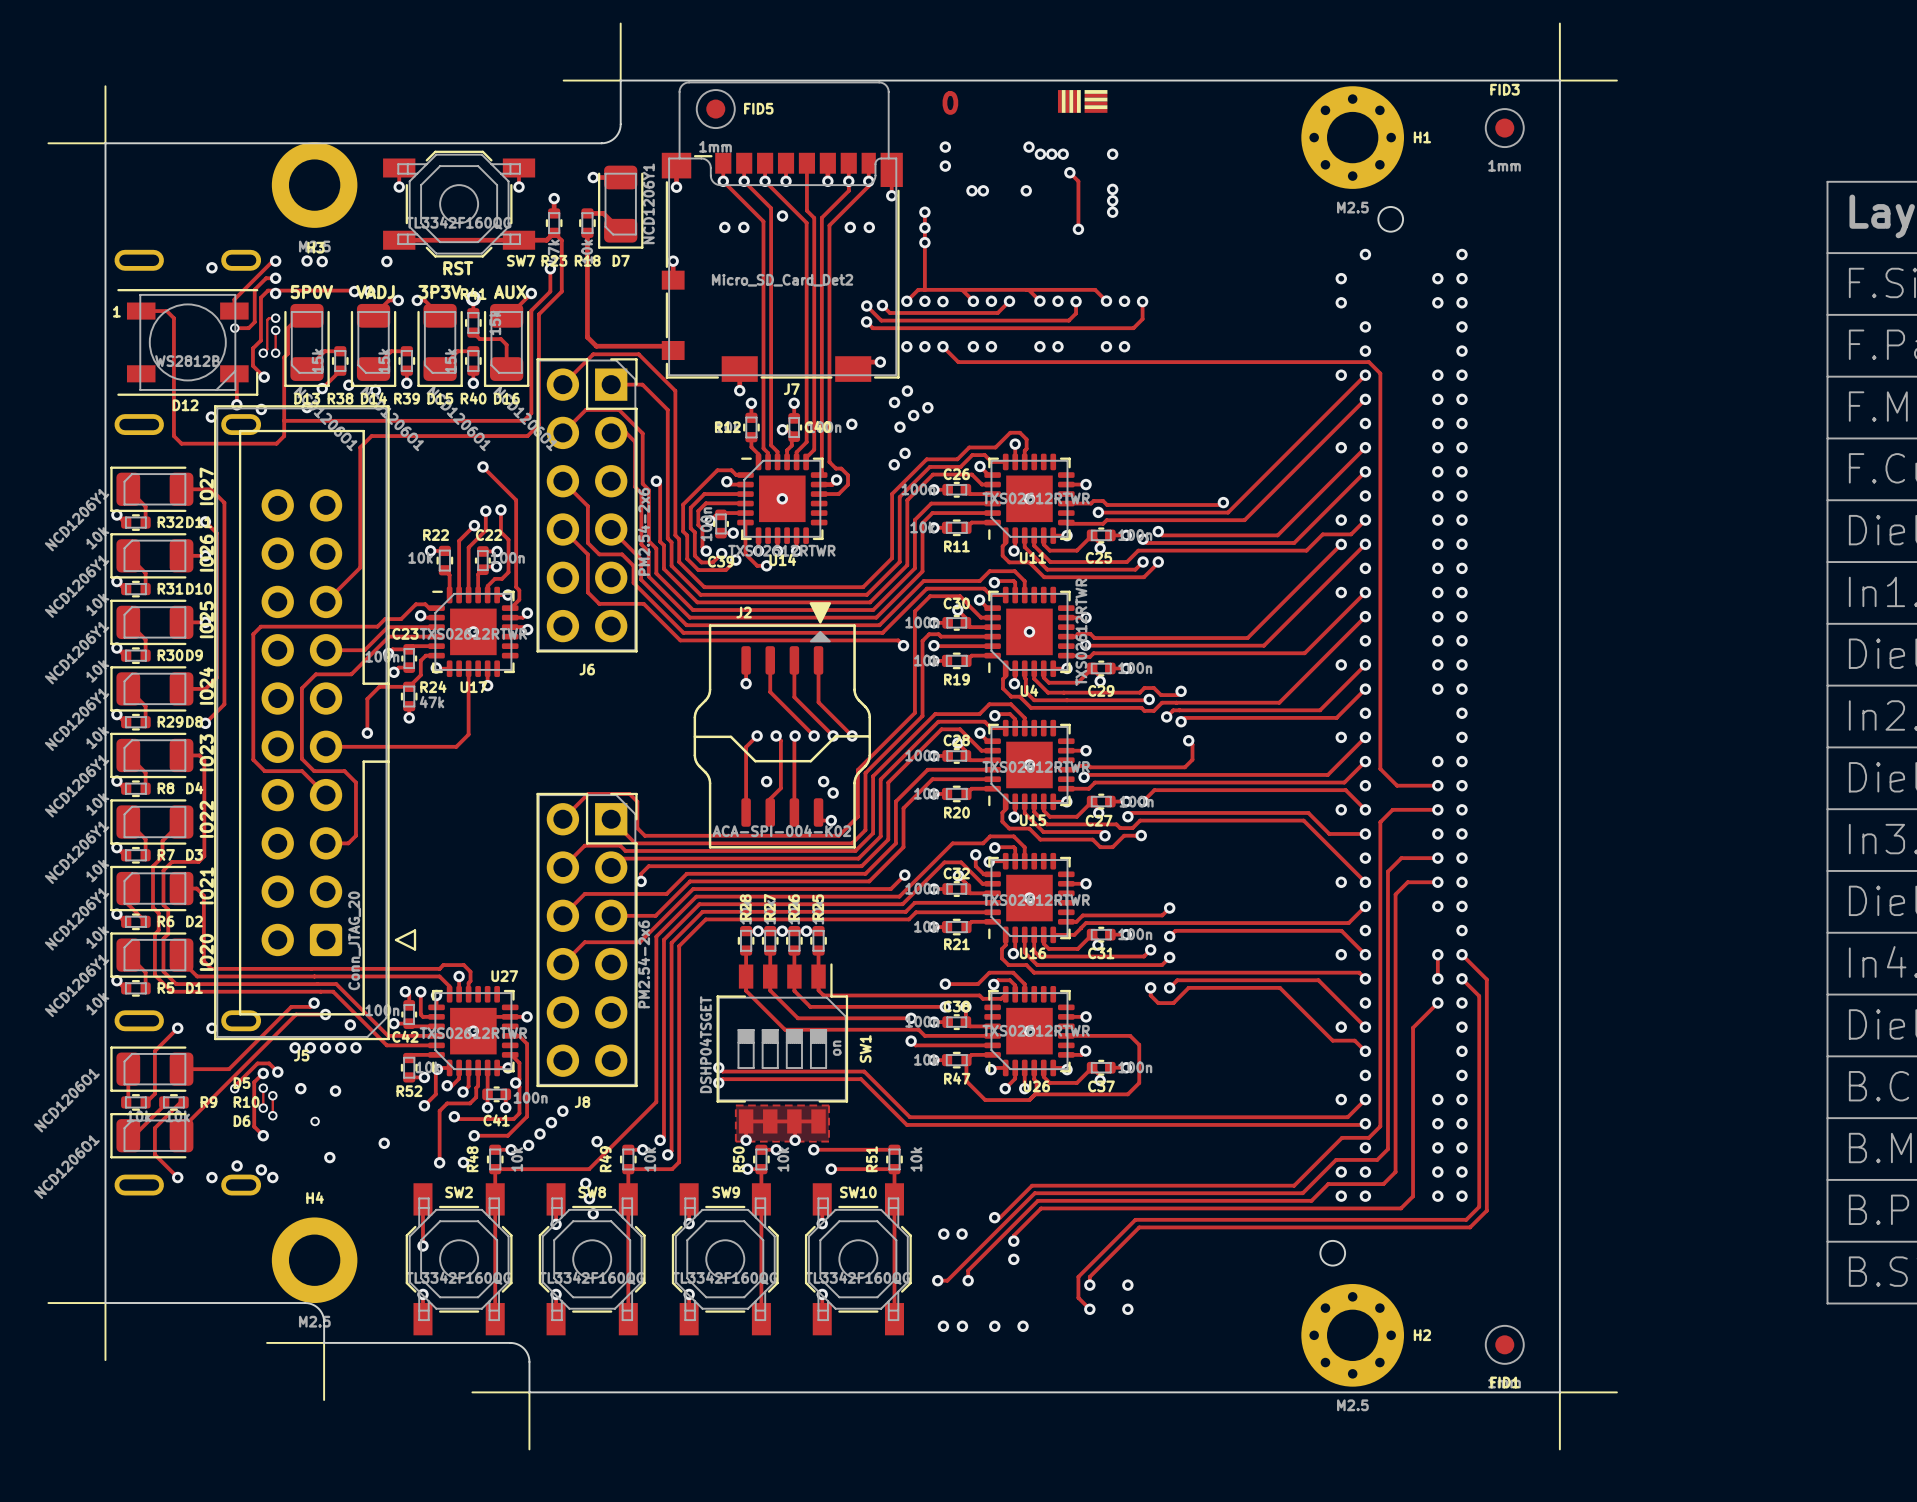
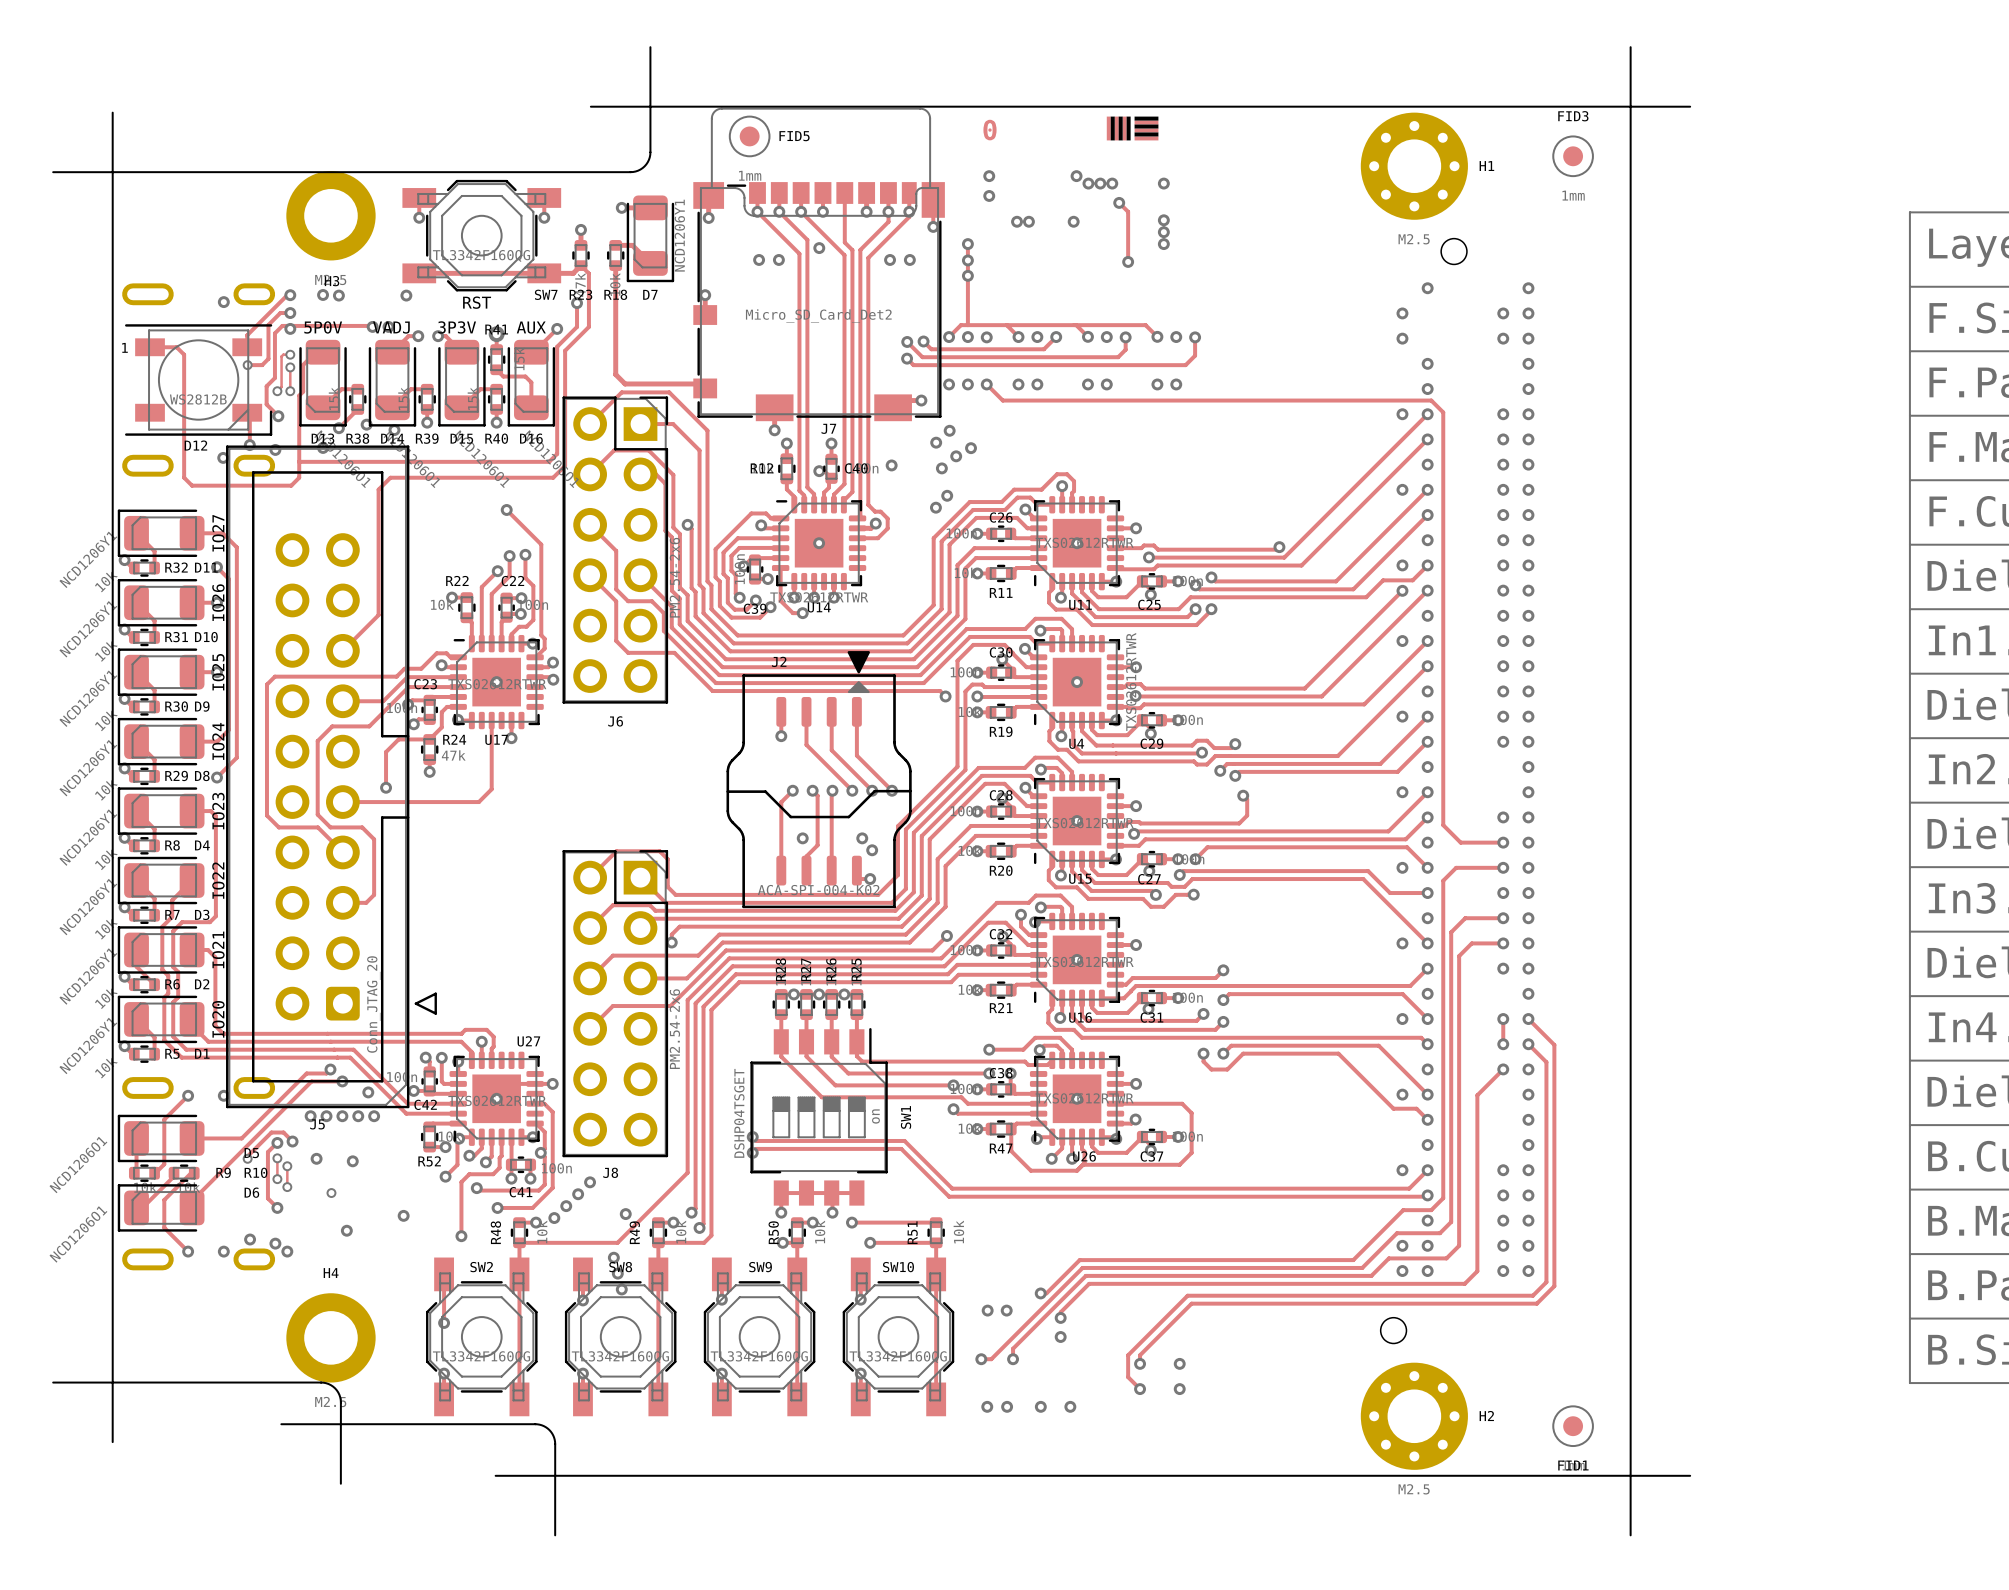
zone outline: (735, 1105) (829, 1105) (829, 1141) (735, 1141) (735, 1105) -> none
via: (463, 1162) -> none

